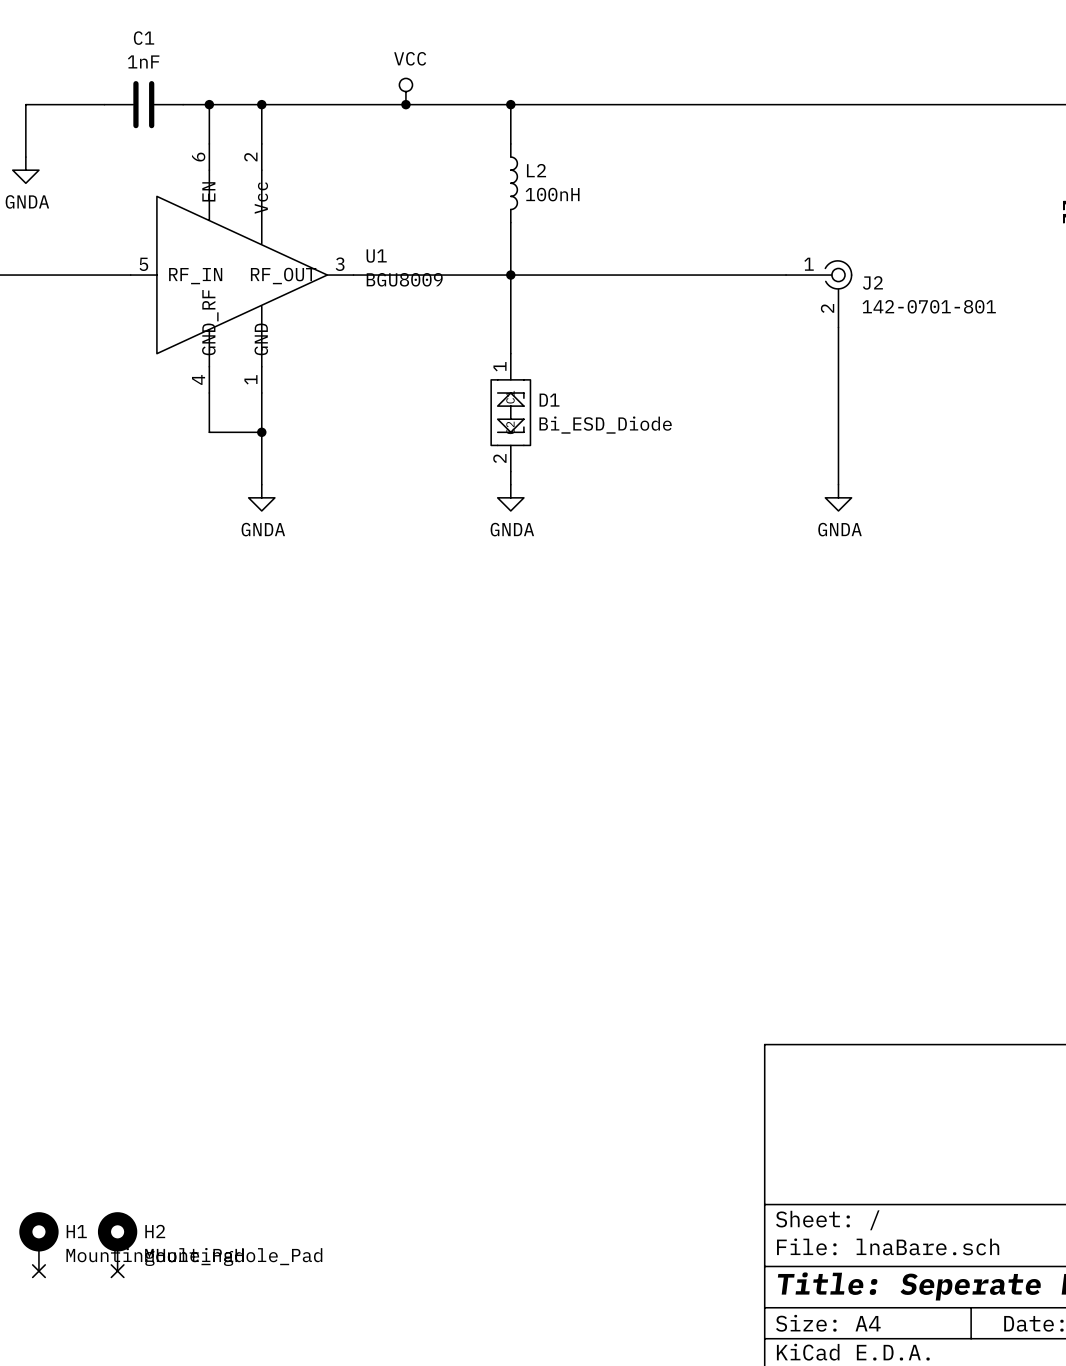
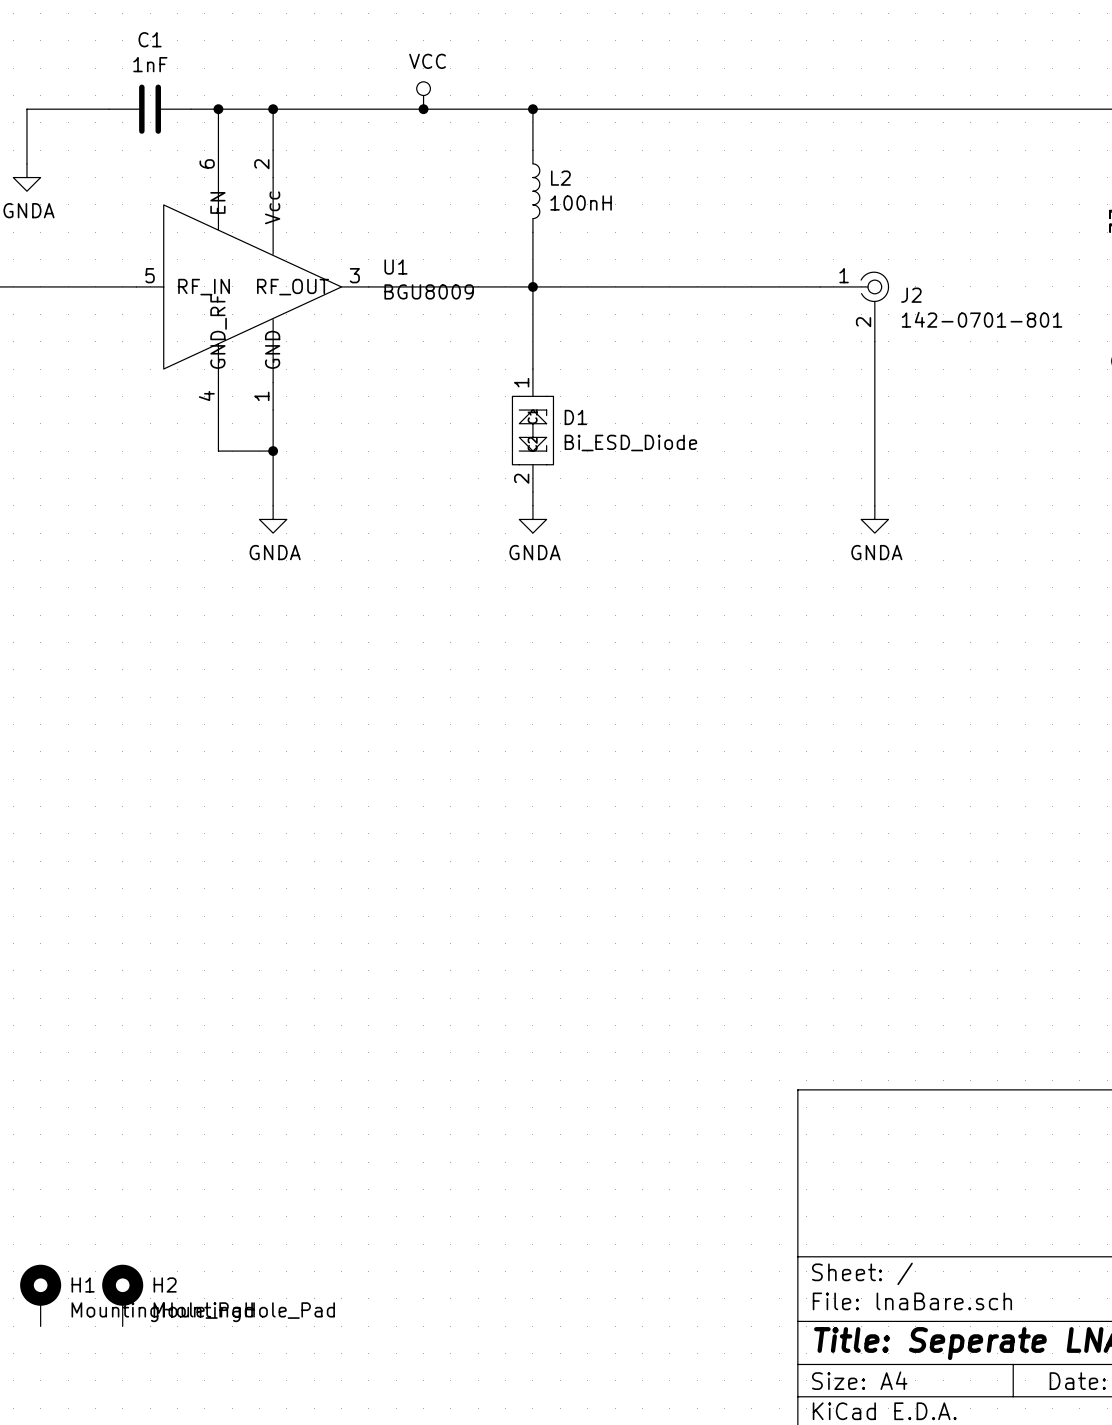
no-connect mark: (38, 1271) -> none
no-connect mark: (117, 1271) -> none

